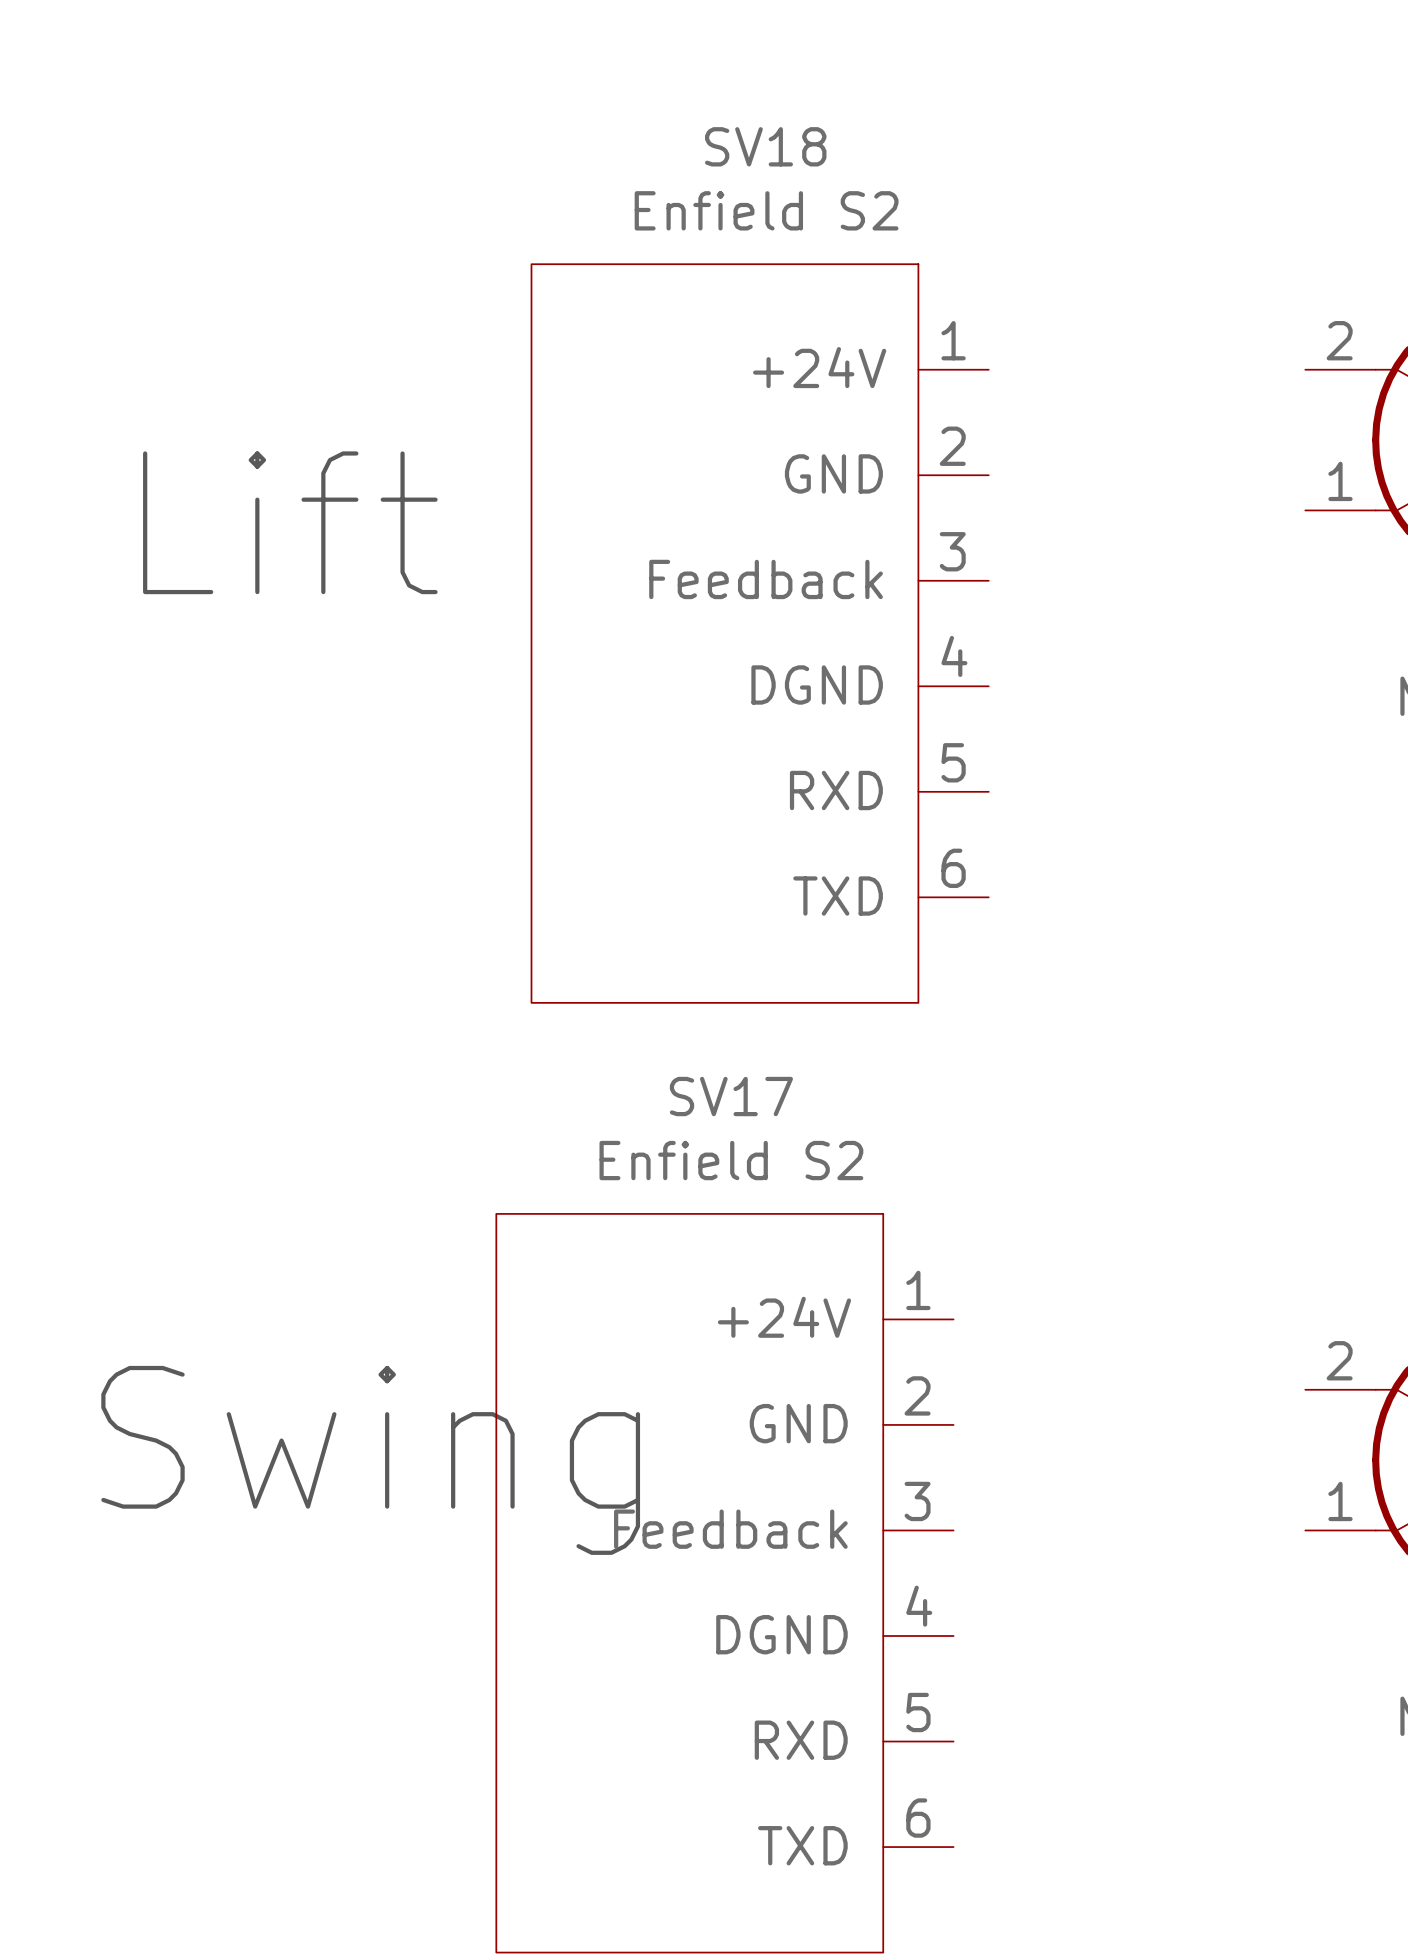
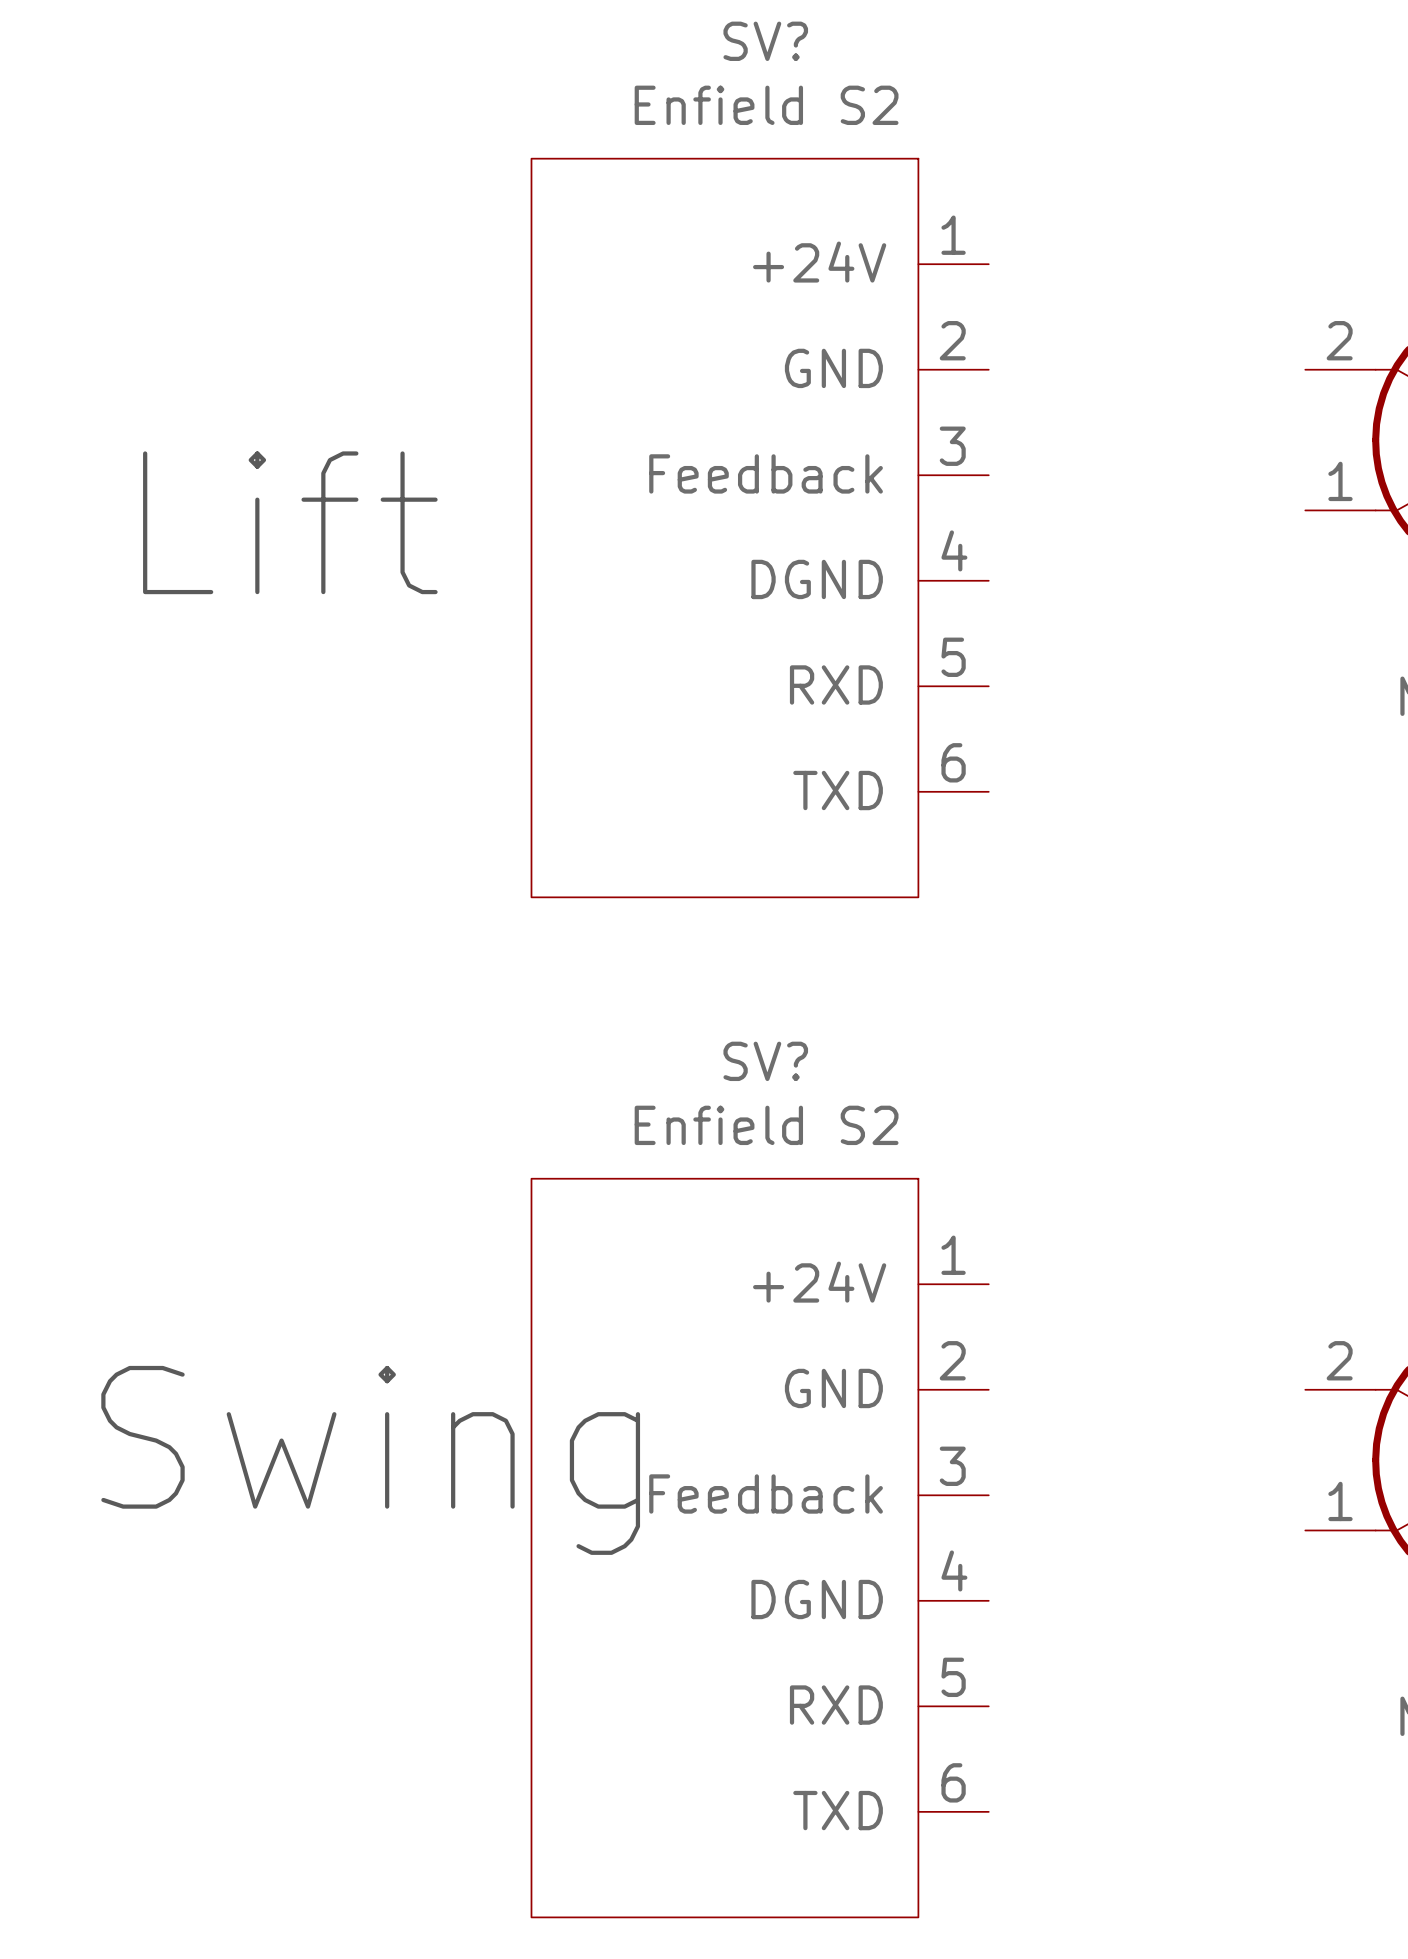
SV?: none -> Enfield S2 (760, 528)
SV18: Enfield S2 (760, 633) -> none
SV?: none -> Enfield S2 (760, 1548)
SV17: Enfield S2 (724, 1583) -> none

